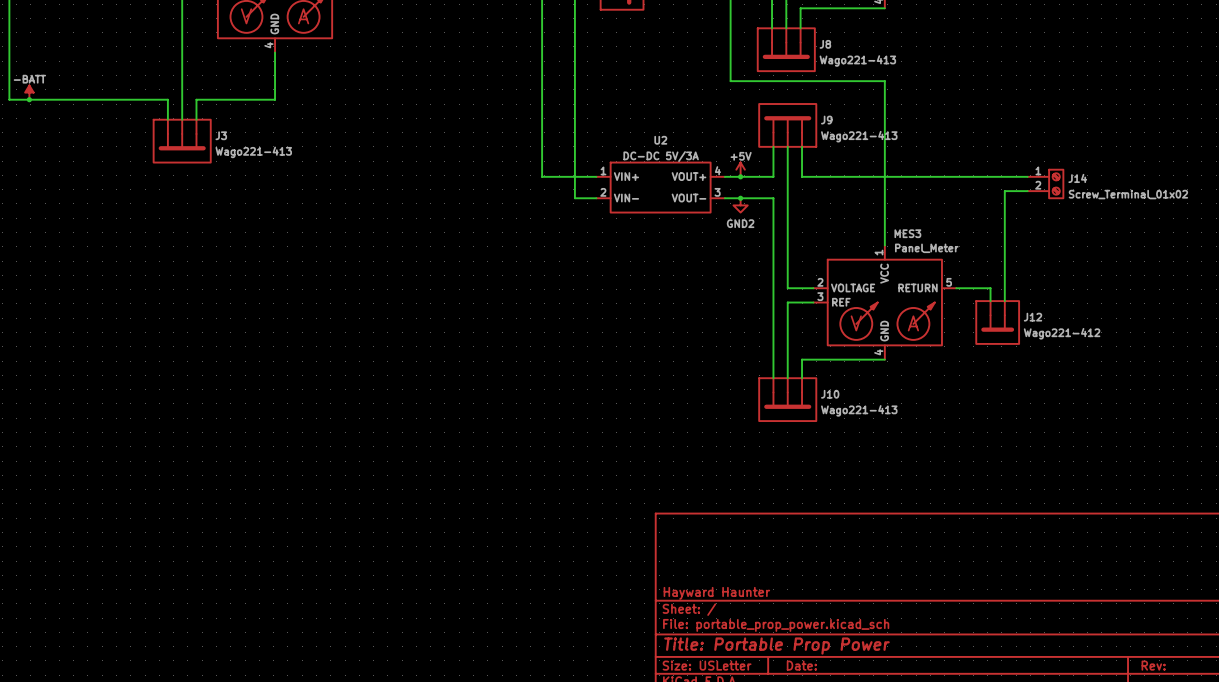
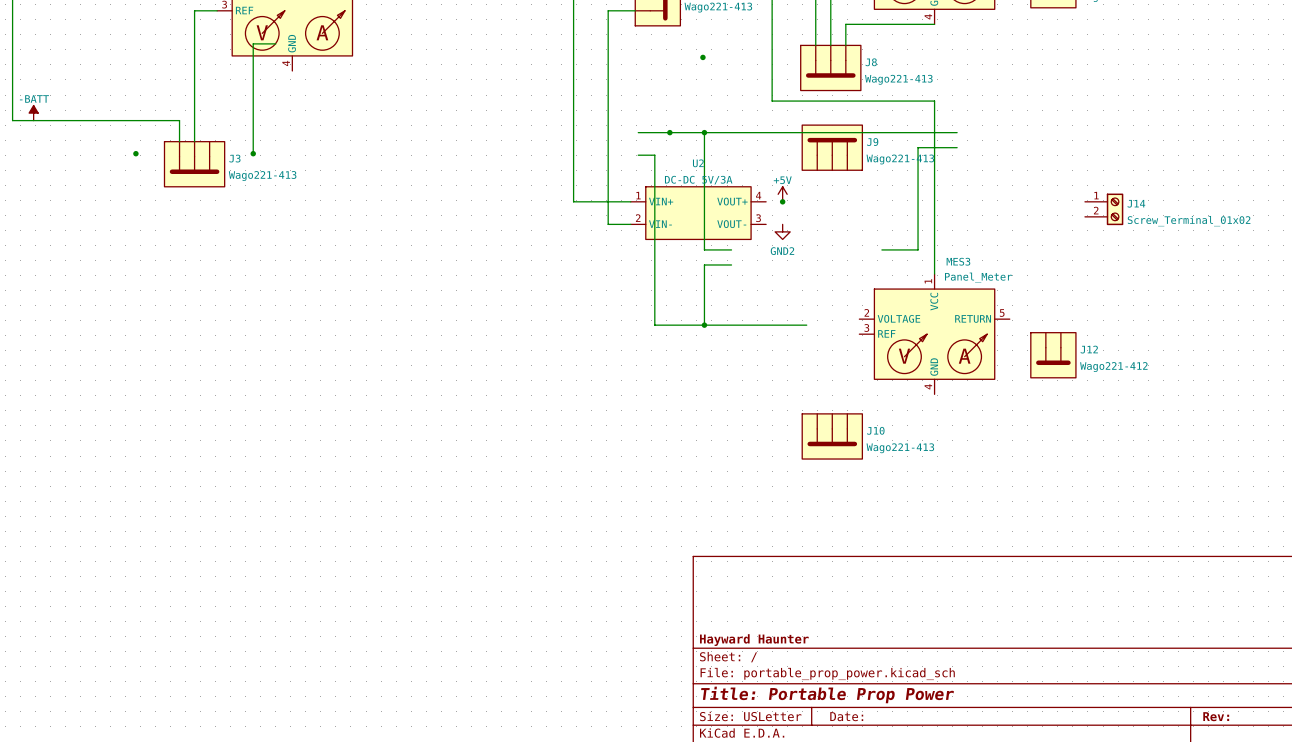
wire: none -> (275, 43) (253, 43) (253, 153)
junction: none -> (702, 57)
wire: (275, 52) (275, 99) (196, 99) (196, 119) -> none
junction: (29, 99) -> none
wire: none -> (638, 132) (957, 132)
junction: none -> (669, 132)
wire: none -> (704, 132) (704, 249) (731, 249)
junction: none -> (704, 132)
wire: none -> (957, 147) (918, 147) (918, 249) (881, 249)
junction: none -> (135, 153)
junction: none -> (253, 153)
wire: none -> (638, 155) (654, 155) (654, 325) (806, 325)
wire: (773, 146) (773, 176) (724, 176) -> none
wire: (787, 146) (787, 288) (813, 288) -> none
wire: (802, 146) (802, 176) (1027, 176) -> none
wire: (1027, 191) (1004, 191) (1004, 301) -> none
wire: (724, 198) (773, 198) (773, 378) -> none
junction: (740, 198) -> none
wire: none -> (731, 264) (704, 264) (704, 325)
wire: (956, 288) (990, 288) (990, 301) -> none
junction: none -> (704, 325)
wire: (813, 302) (787, 302) (787, 378) -> none
wire: (884, 359) (802, 359) (802, 378) -> none

